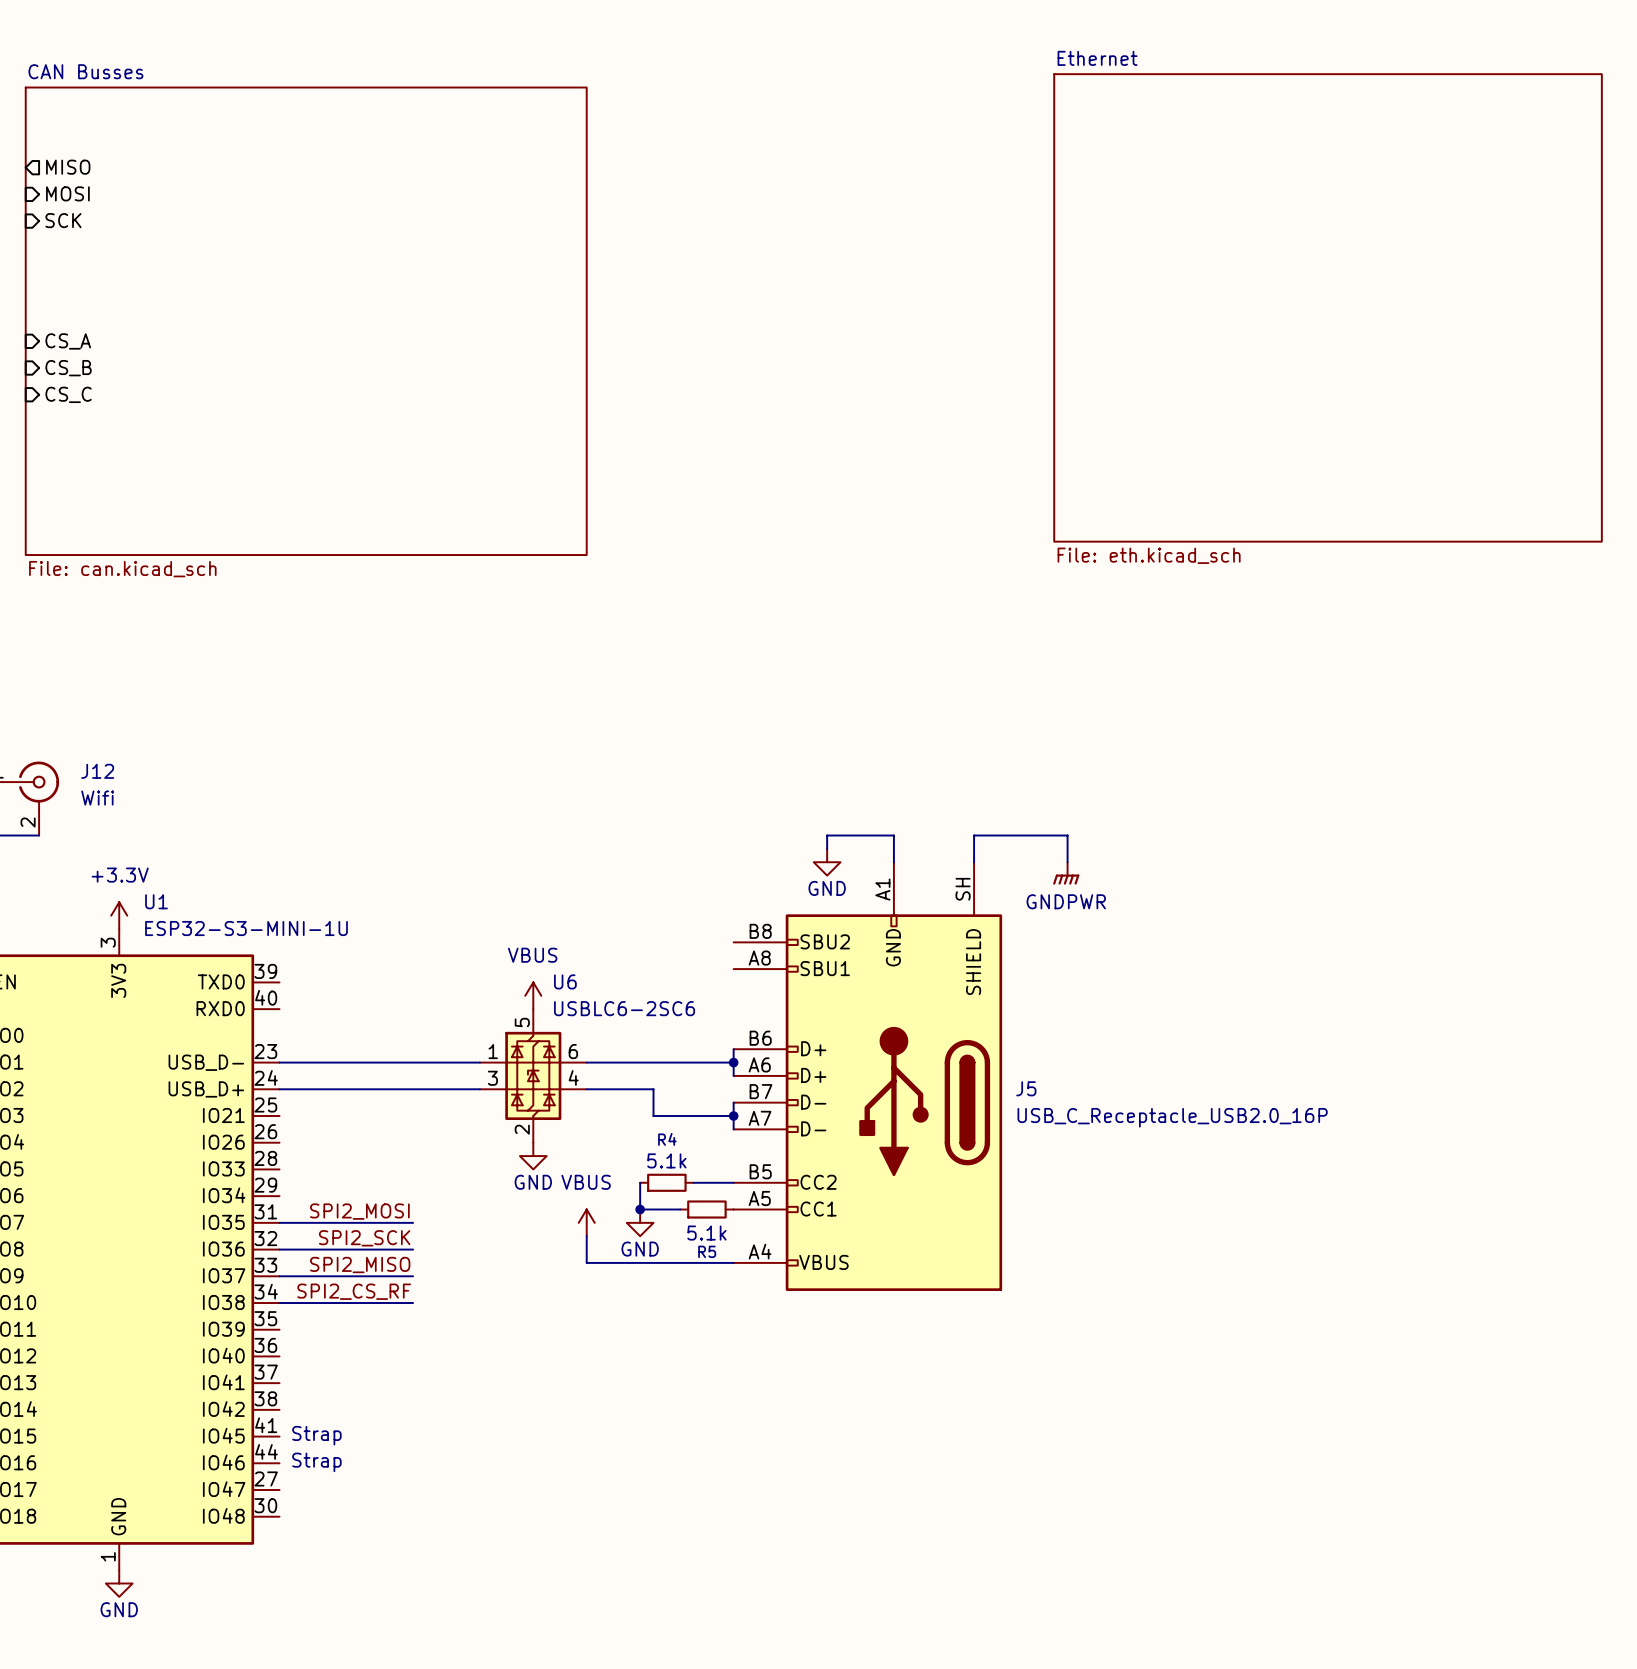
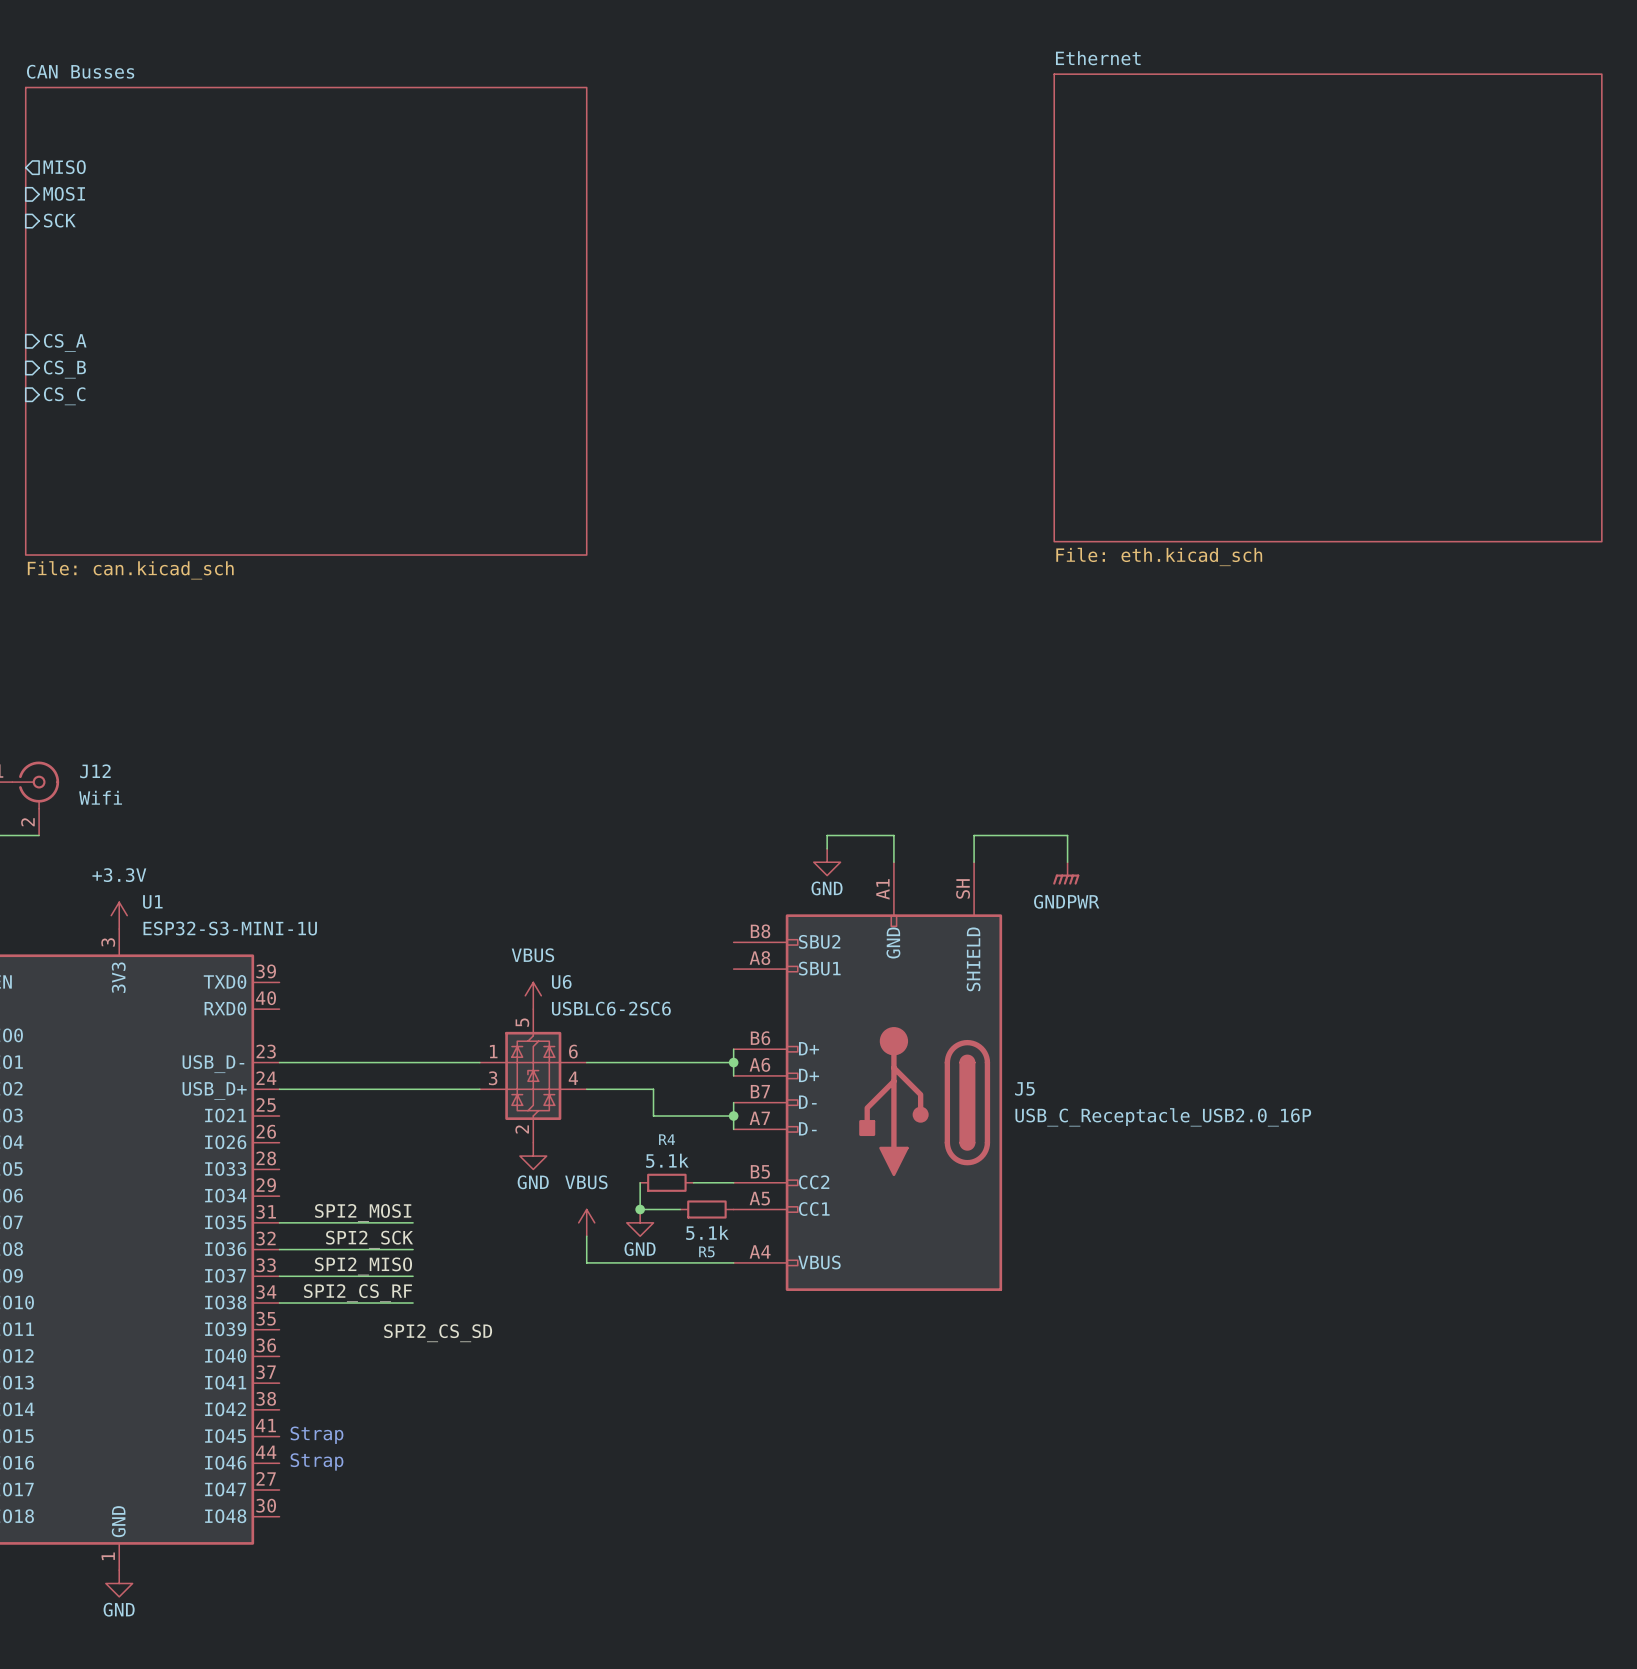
label: none -> SPI2_CS_SD (438, 1333)

